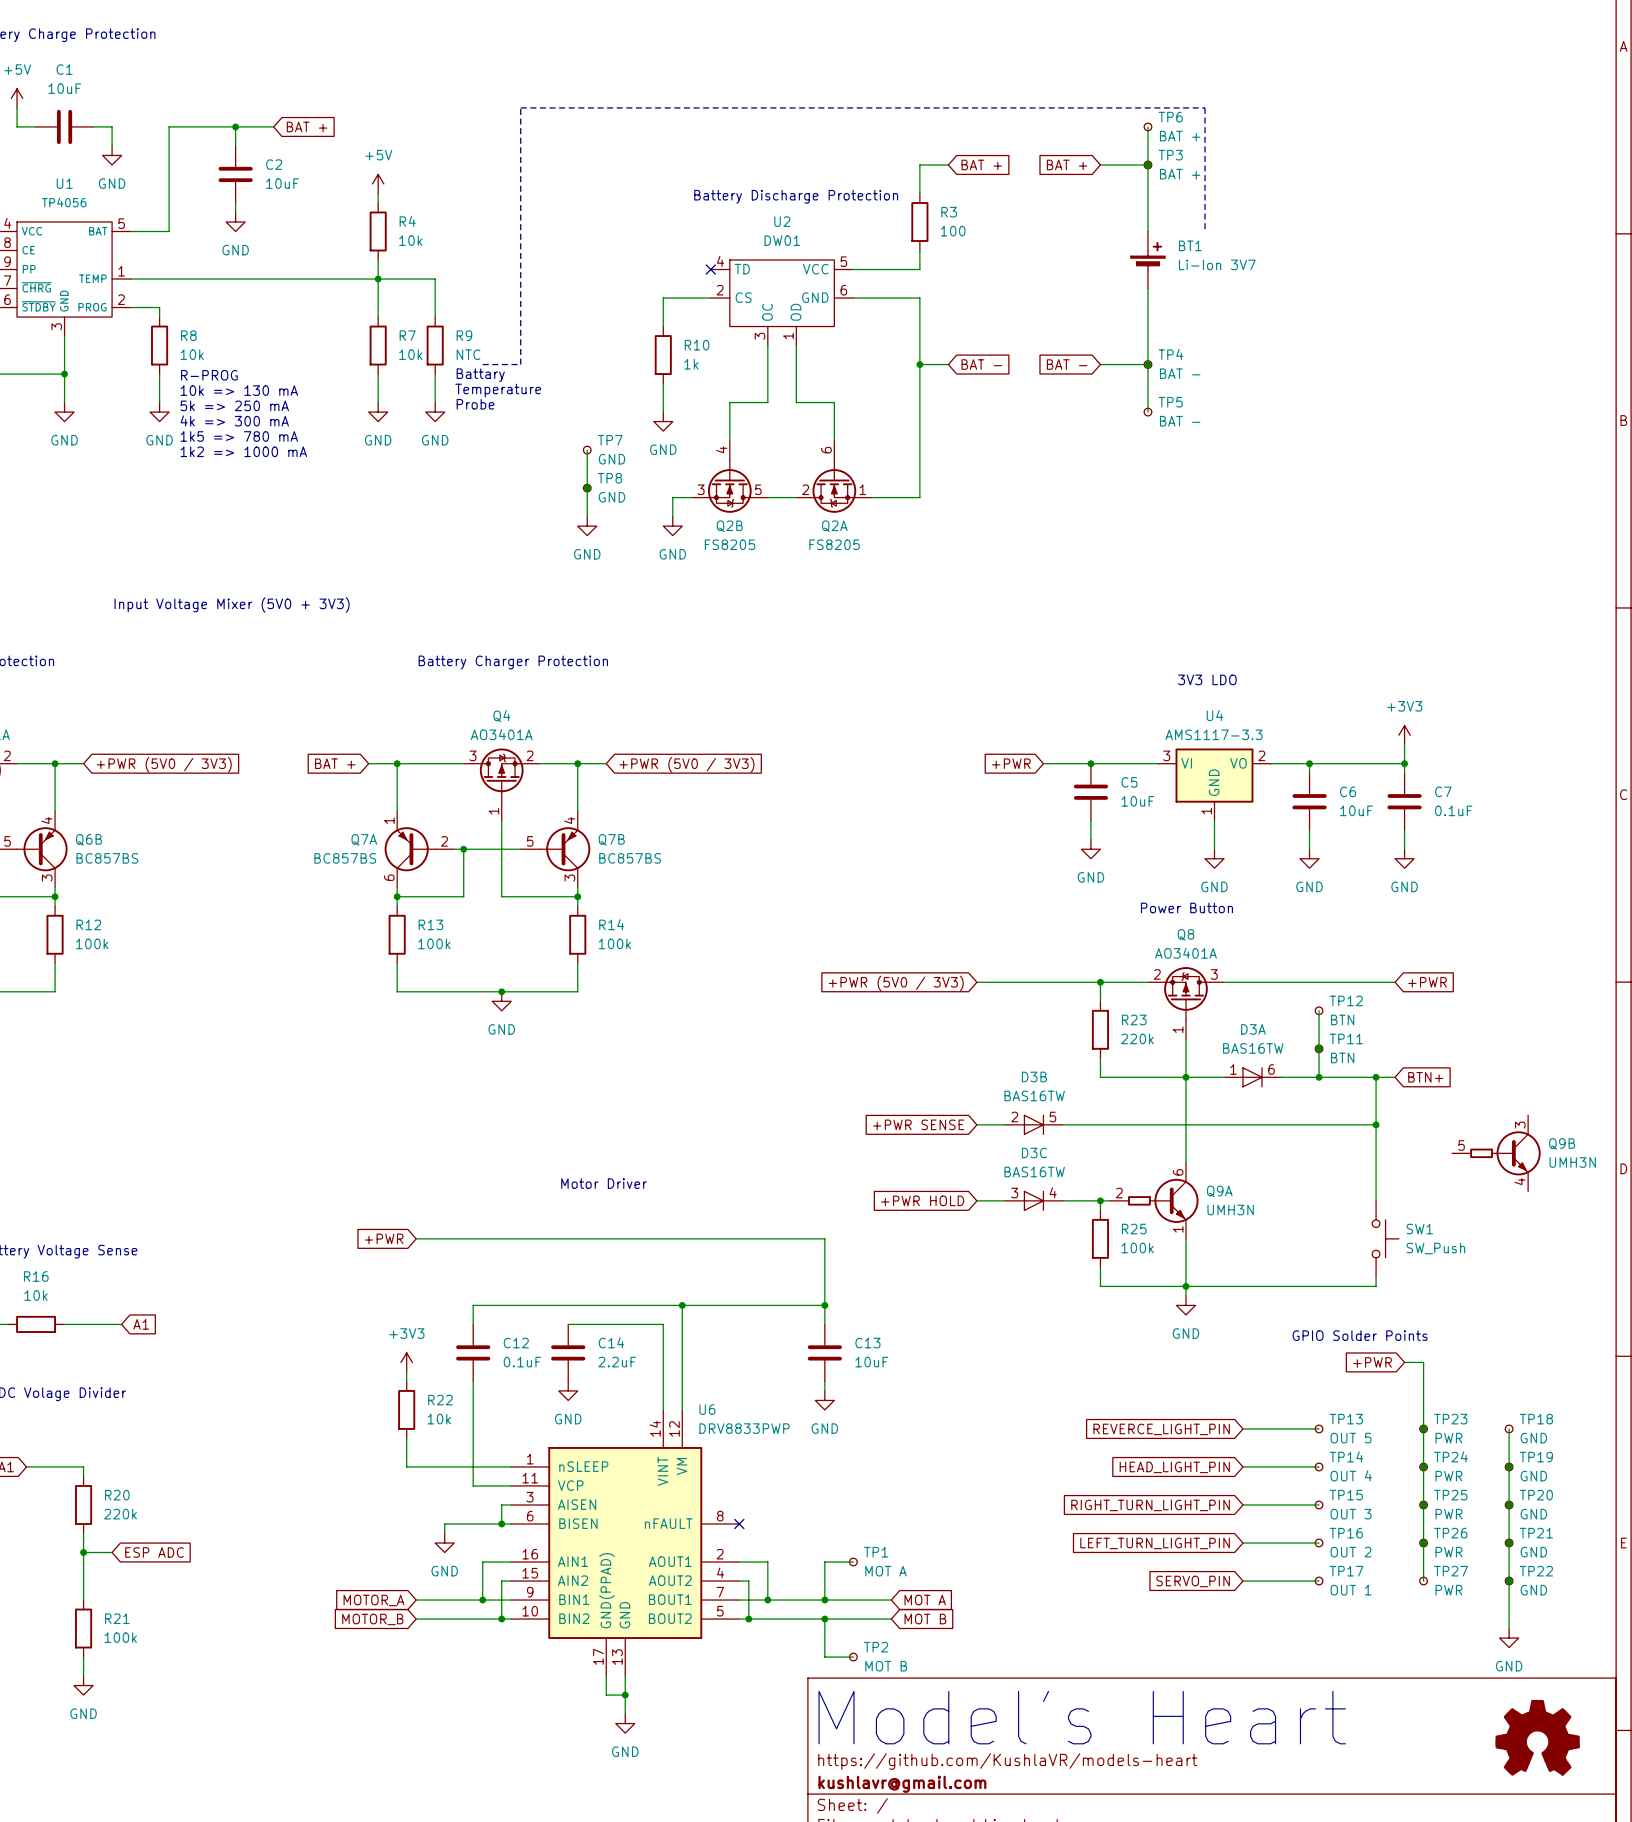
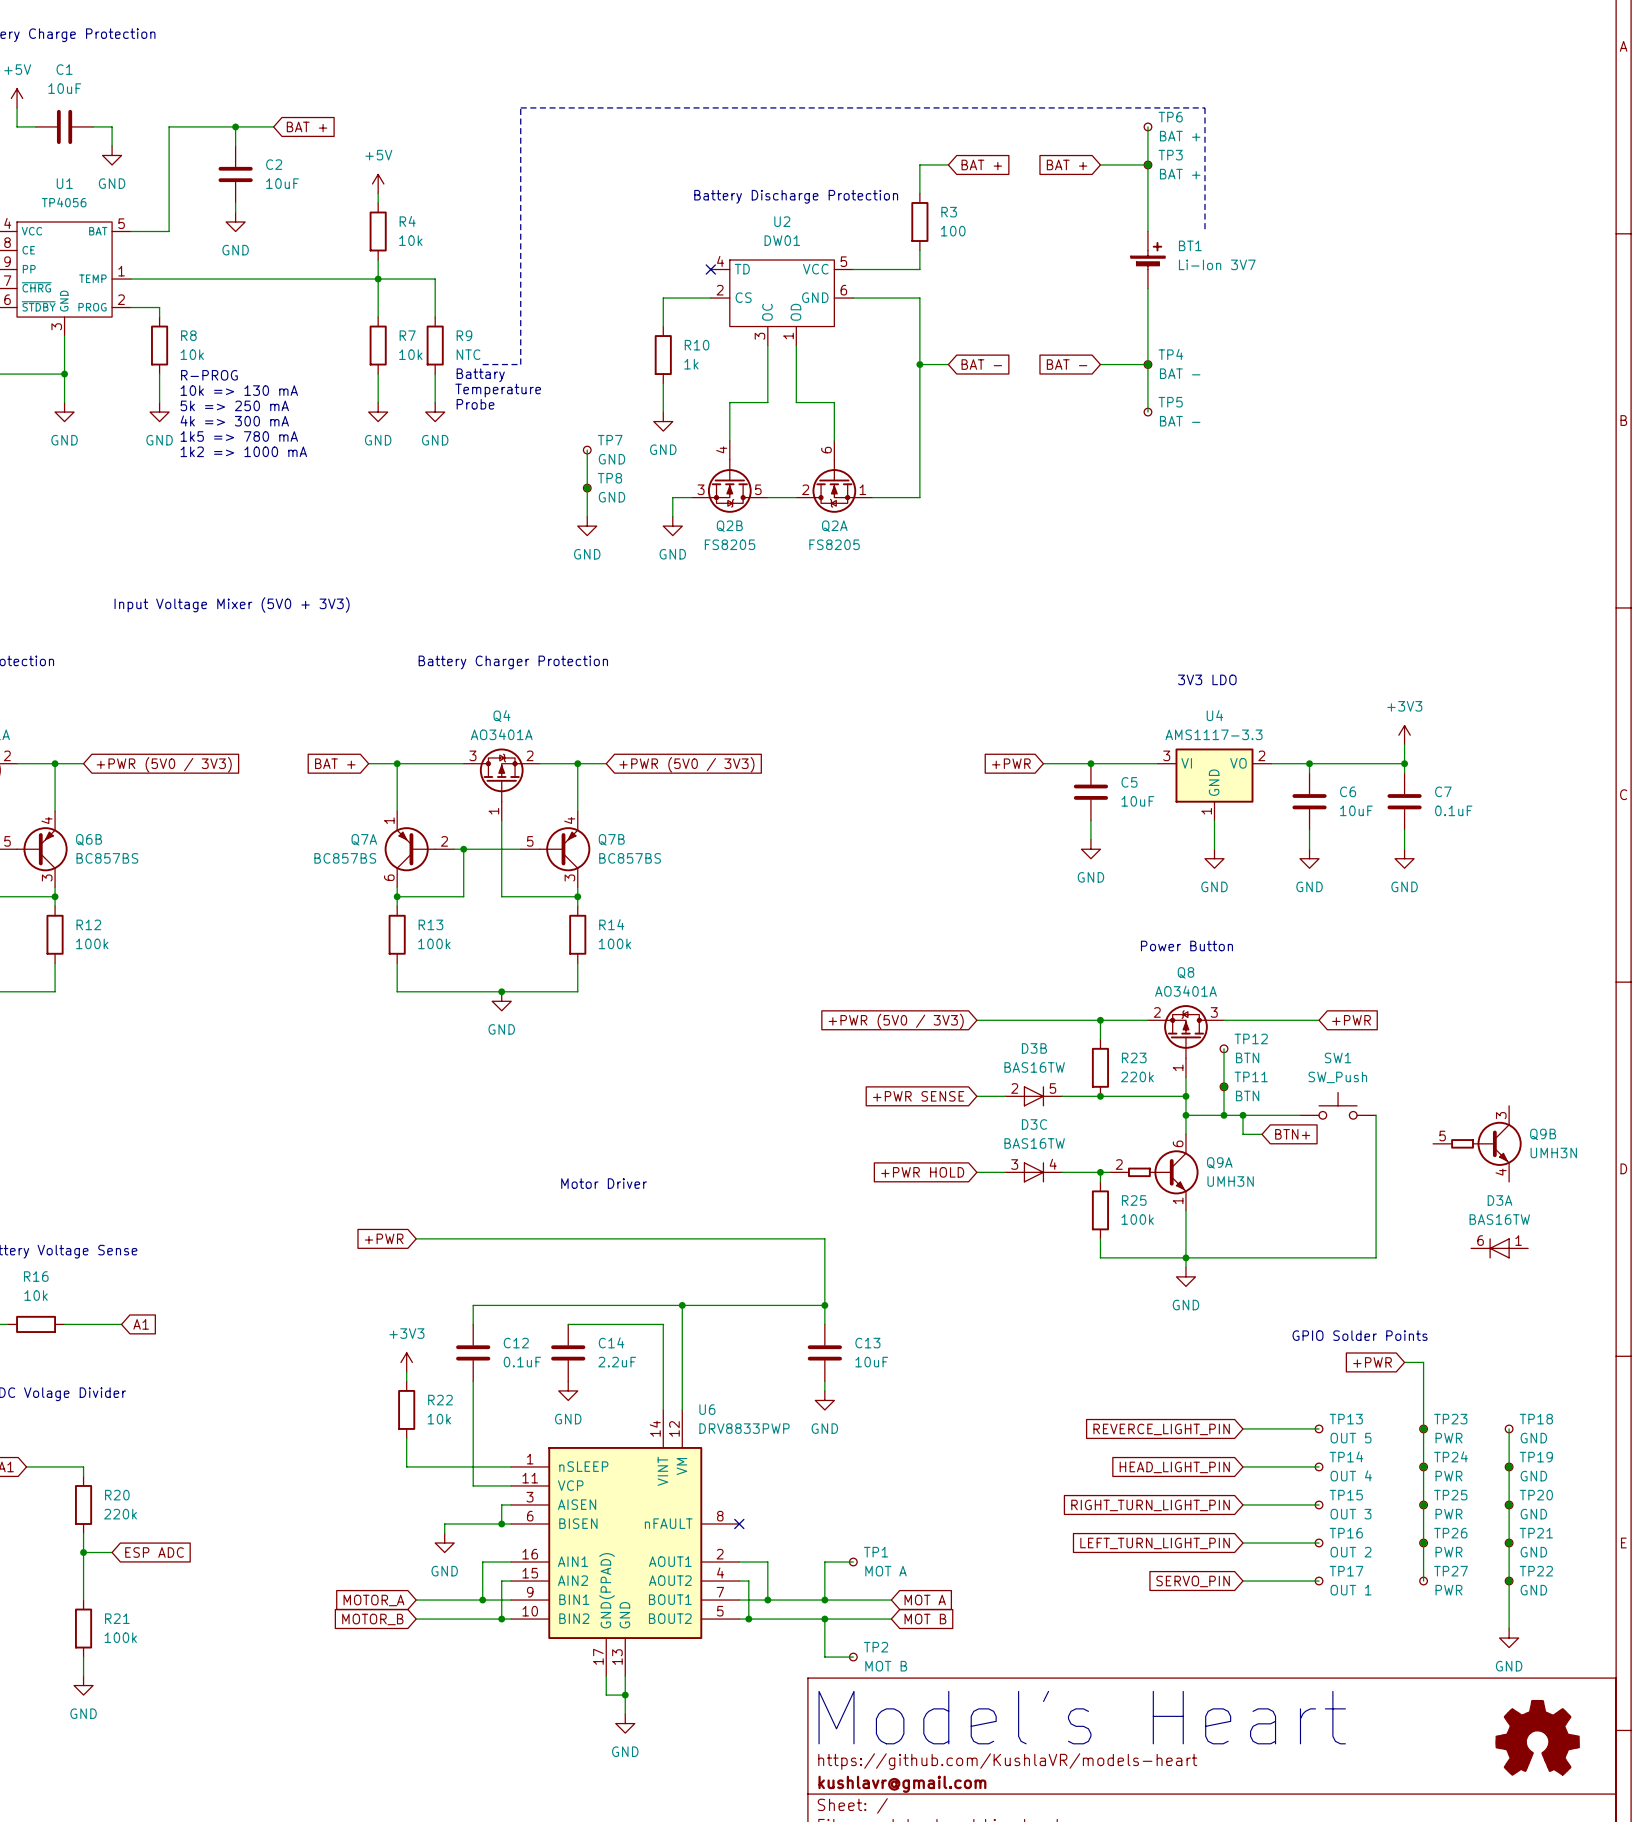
text position: Power Button (1186, 907) -> Power Button (1186, 945)
wire: (976, 982) (1147, 982) -> (976, 1020) (1147, 1020)
wire: (1100, 982) (1100, 1001) -> (1100, 1020) (1100, 1039)
junction position: (1100, 982) -> (1100, 1020)
wire: (1224, 982) (1395, 982) -> none
global label position: +PWR (1427, 982) -> +PWR (1351, 1020)
global label position: +PWR (5V0 / 3V3) (896, 983) -> +PWR (5V0 / 3V3) (896, 1021)
Q8 position: (1185, 1003) -> (1185, 1041)
wire: (1319, 1010) (1319, 1077) -> (1224, 1048) (1224, 1115)
TP12 position: (1319, 1010) -> (1224, 1048)
wire: none -> (1224, 1020) (1319, 1020)
R23 position: (1100, 1029) -> (1100, 1067)
junction: (1319, 1048) -> none
TP11 position: (1319, 1048) -> (1224, 1086)
wire: (1100, 1058) (1100, 1077) (1224, 1077) -> none
junction: (1185, 1077) -> none
D3A rotation: 0° (1252, 1077) -> 180° (1499, 1248)
D3A position: (1252, 1077) -> (1499, 1248)
wire: (1281, 1077) (1395, 1077) -> (1185, 1115) (1300, 1115)
junction: (1319, 1077) -> none
wire: (1376, 1077) (1376, 1115) -> none
junction: (1376, 1077) -> none
global label position: BTN+ (1425, 1077) -> BTN+ (1292, 1134)
junction: none -> (1224, 1086)
wire: none -> (1062, 1096) (1185, 1096)
junction: none -> (1100, 1096)
junction: none -> (1185, 1096)
junction: none -> (1185, 1115)
junction: none -> (1224, 1115)
wire: none -> (1243, 1115) (1243, 1134) (1262, 1134)
junction: none -> (1243, 1115)
global label position: +PWR SENSE (918, 1124) -> +PWR SENSE (918, 1096)
wire: (976, 1124) (1005, 1124) -> (976, 1096) (1005, 1096)
D3B position: (1033, 1124) -> (1033, 1096)
wire: (1062, 1124) (1376, 1124) -> none
junction: (1376, 1124) -> none
Q9B position: (1496, 1153) -> (1477, 1143)
global label position: +PWR HOLD (922, 1200) -> +PWR HOLD (922, 1172)
wire: (976, 1200) (1005, 1200) -> (976, 1172) (1005, 1172)
D3C position: (1033, 1200) -> (1033, 1172)
wire: (1062, 1200) (1109, 1200) -> (1062, 1172) (1109, 1172)
wire: (1100, 1200) (1100, 1210) -> (1100, 1172) (1100, 1181)
junction position: (1100, 1200) -> (1100, 1172)
Q9A position: (1154, 1200) -> (1154, 1172)
wire: none -> (1376, 1200) (1376, 1257) (1100, 1257) (1100, 1238)
R25 position: (1100, 1238) -> (1100, 1210)
SW1 rotation: 0° (1385, 1238) -> 90° counterclockwise (1338, 1105)
SW1 position: (1385, 1238) -> (1338, 1105)
SW1 value position: SW_Push (1435, 1248) -> SW_Push (1337, 1077)
wire: (1100, 1267) (1100, 1286) (1376, 1286) (1376, 1276) -> none
junction position: (1185, 1286) -> (1185, 1257)
power symbol position: GND (1185, 1305) -> GND (1185, 1276)

